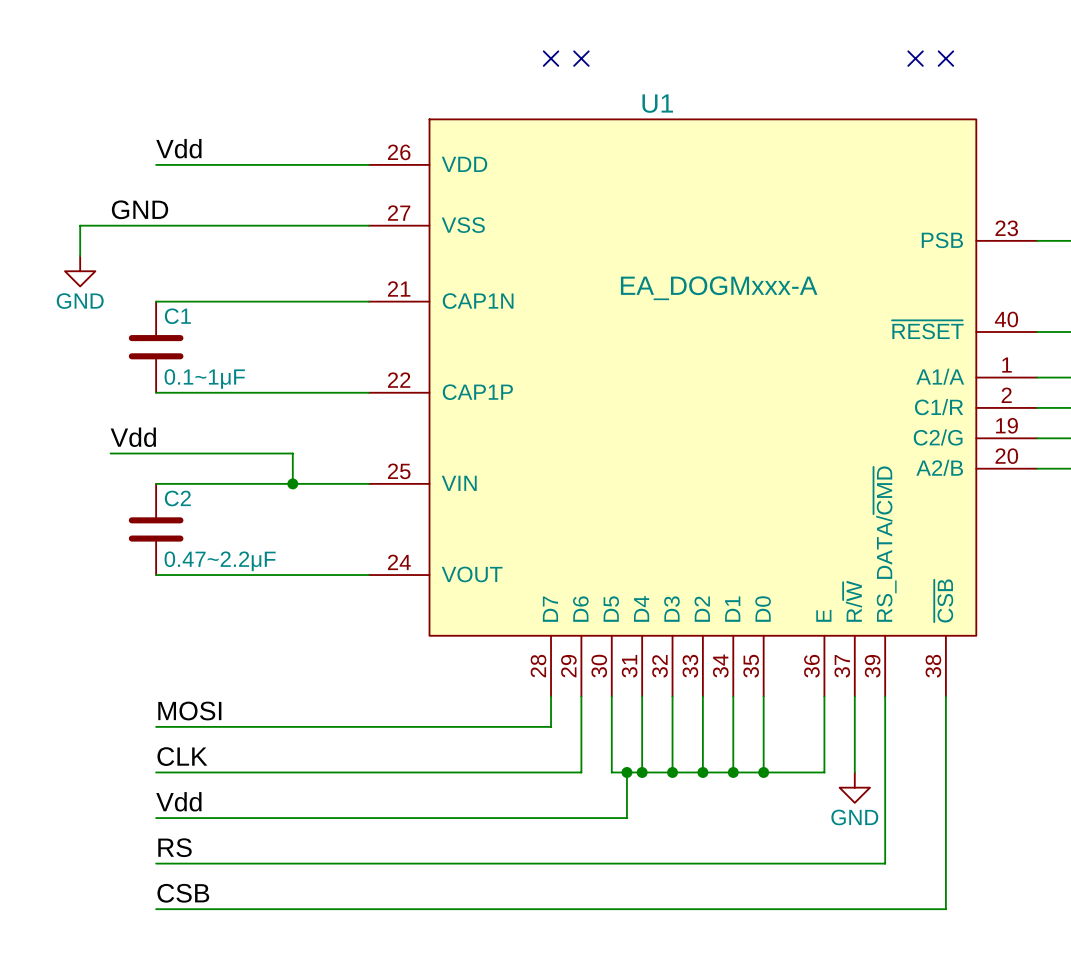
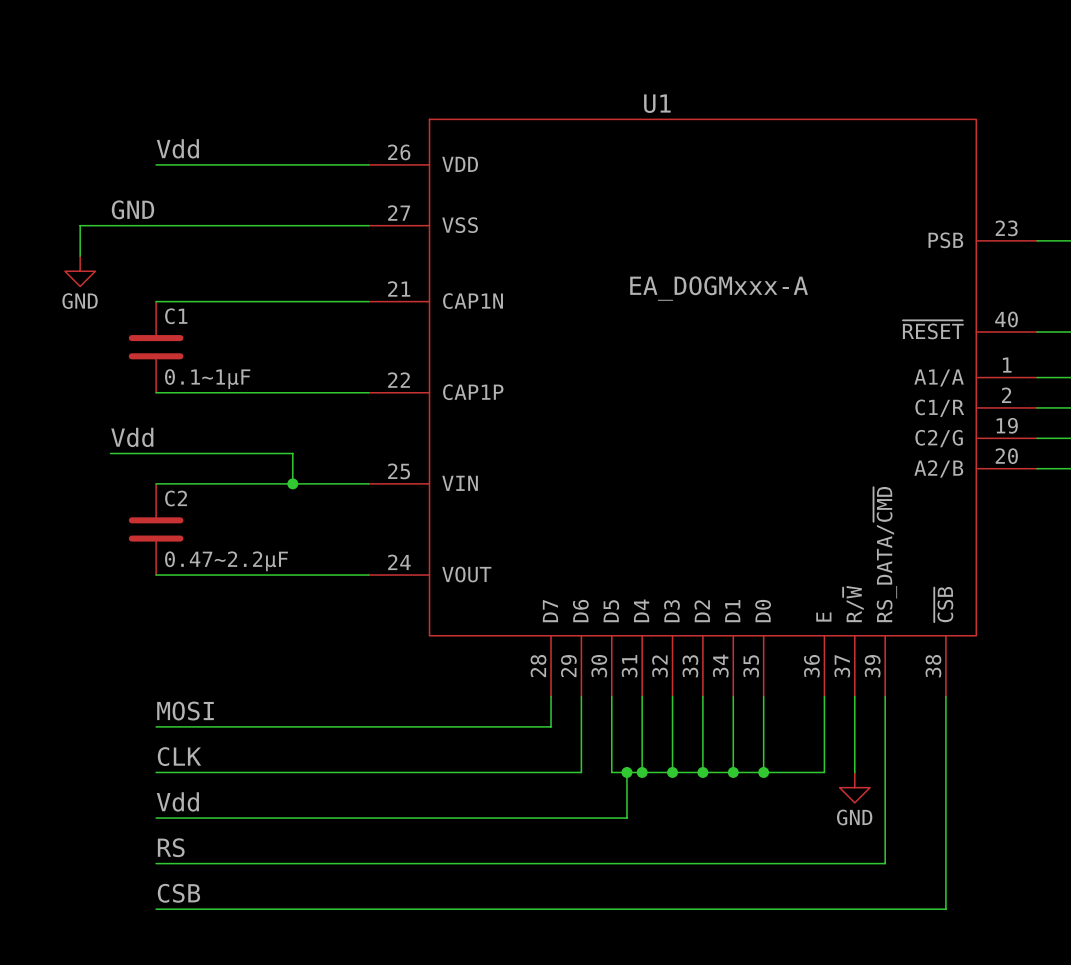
no-connect mark: (551, 58) -> none
no-connect mark: (581, 58) -> none
no-connect mark: (915, 58) -> none
no-connect mark: (945, 58) -> none

